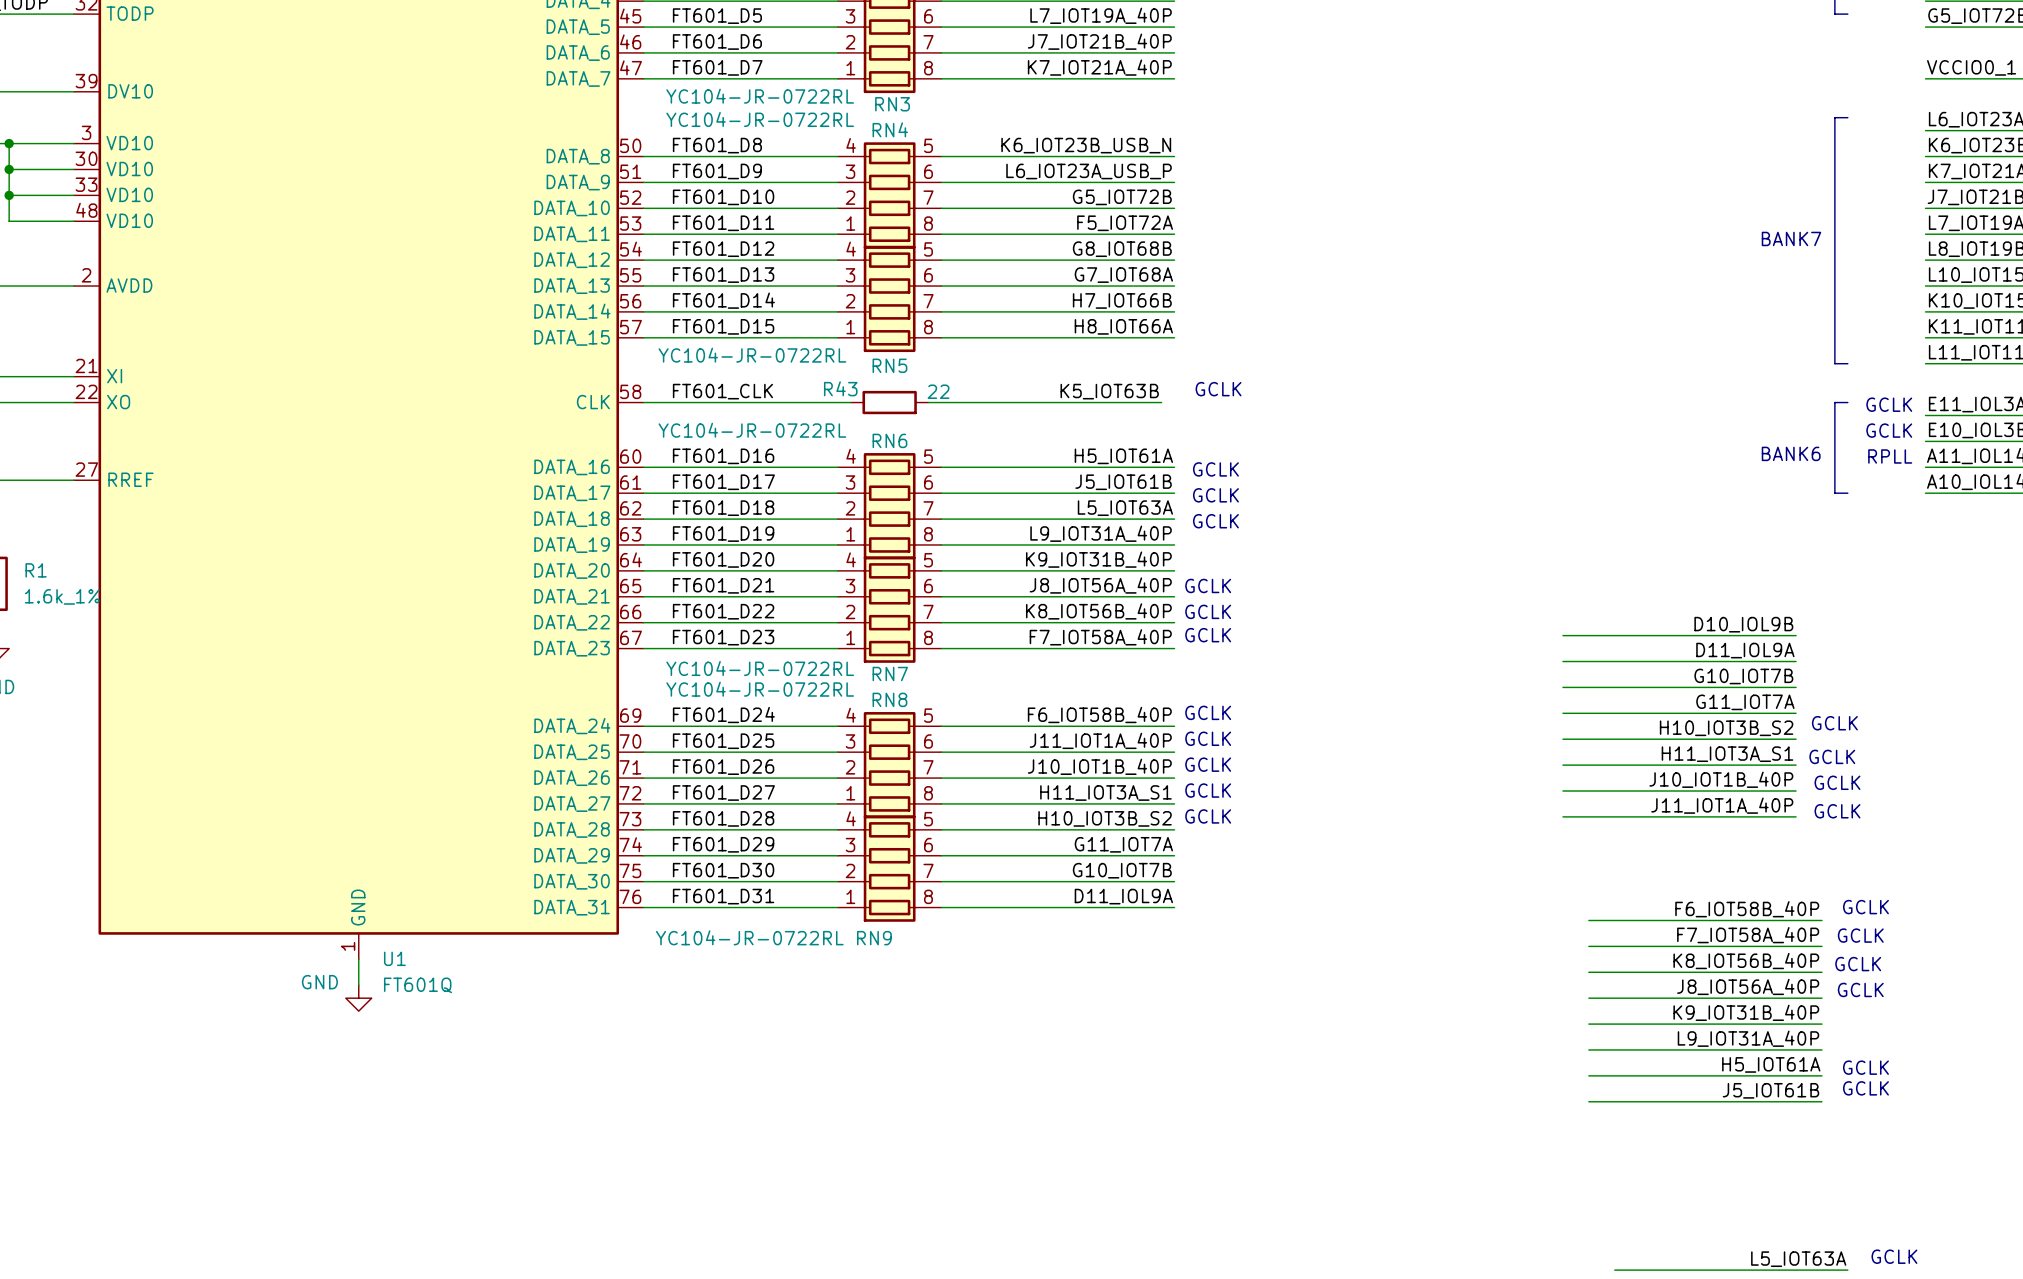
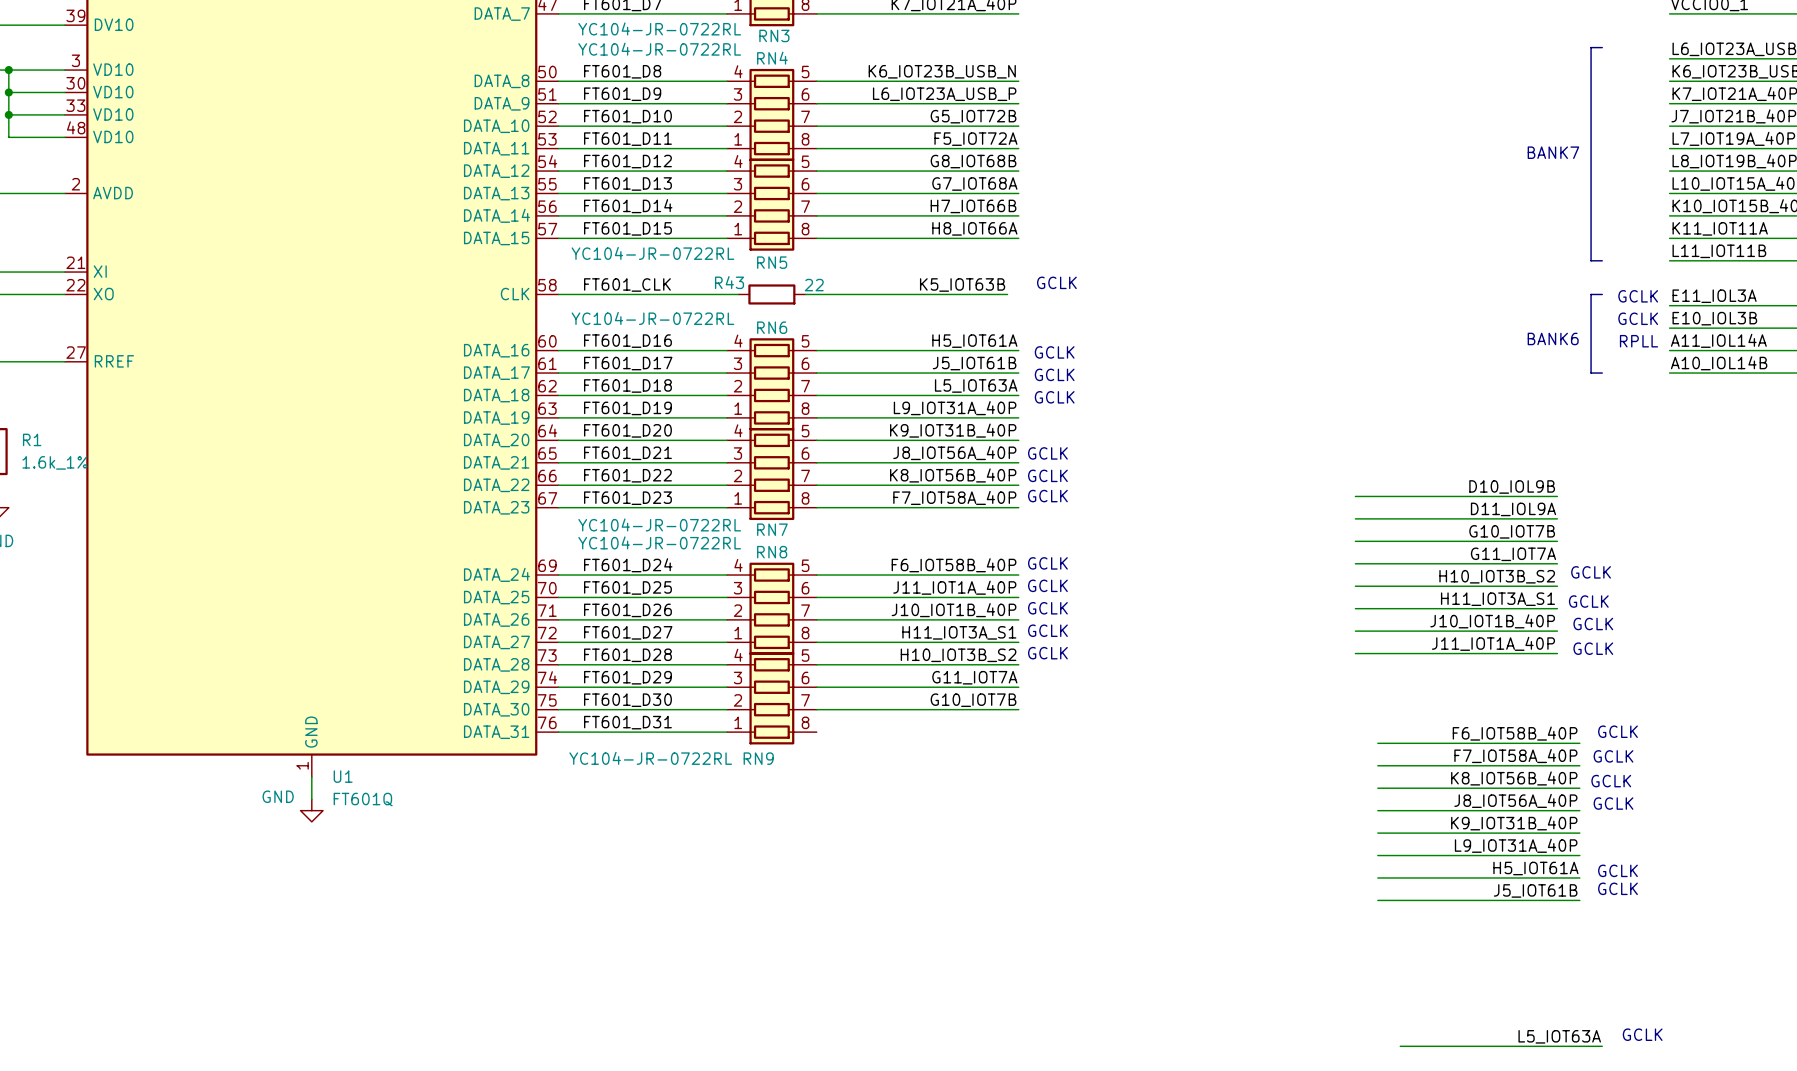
label: D11_IOL9A (1123, 896) -> none
wire: (941, 907) (1174, 907) -> none

